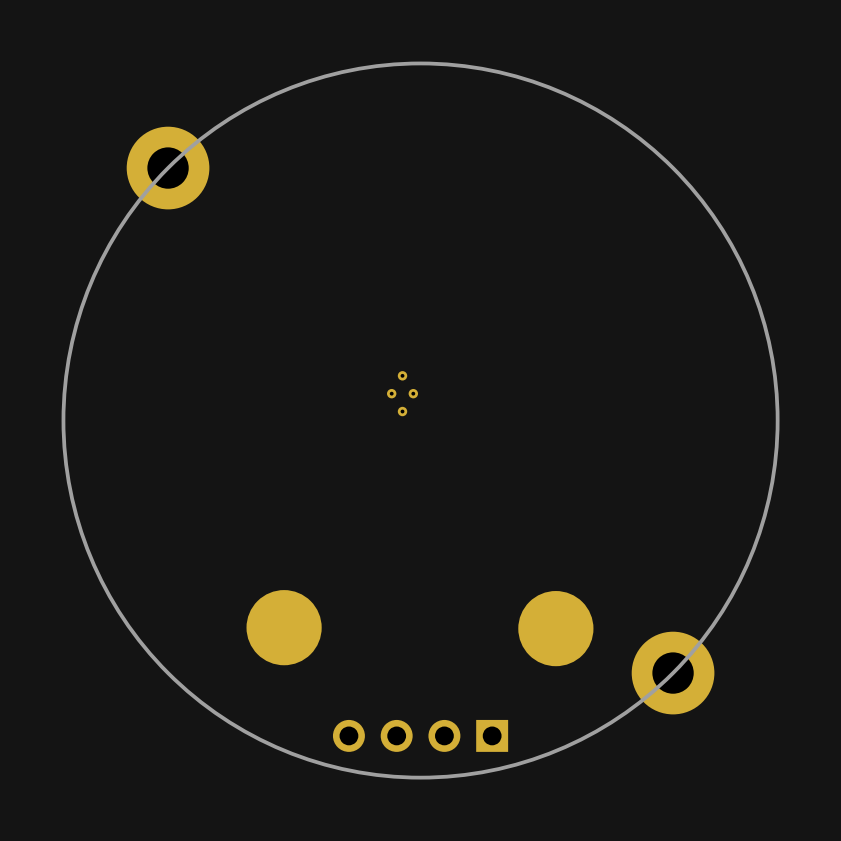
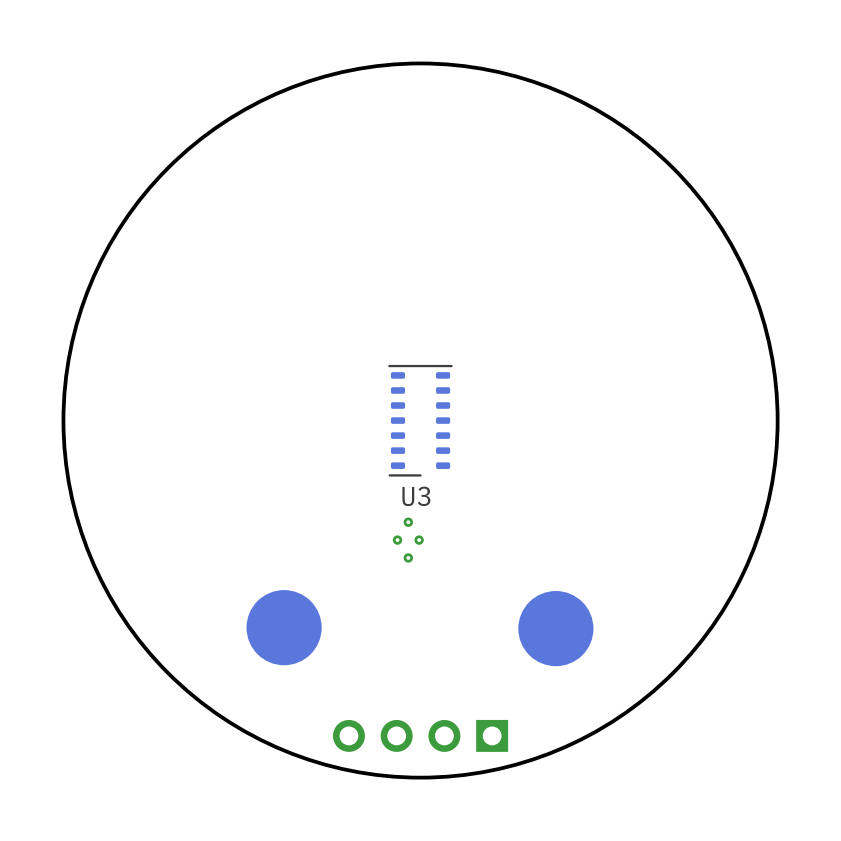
part: (168, 168) -> none
part position: (402, 393) -> (408, 540)
U3: none -> (420, 420)
part: (673, 673) -> none

